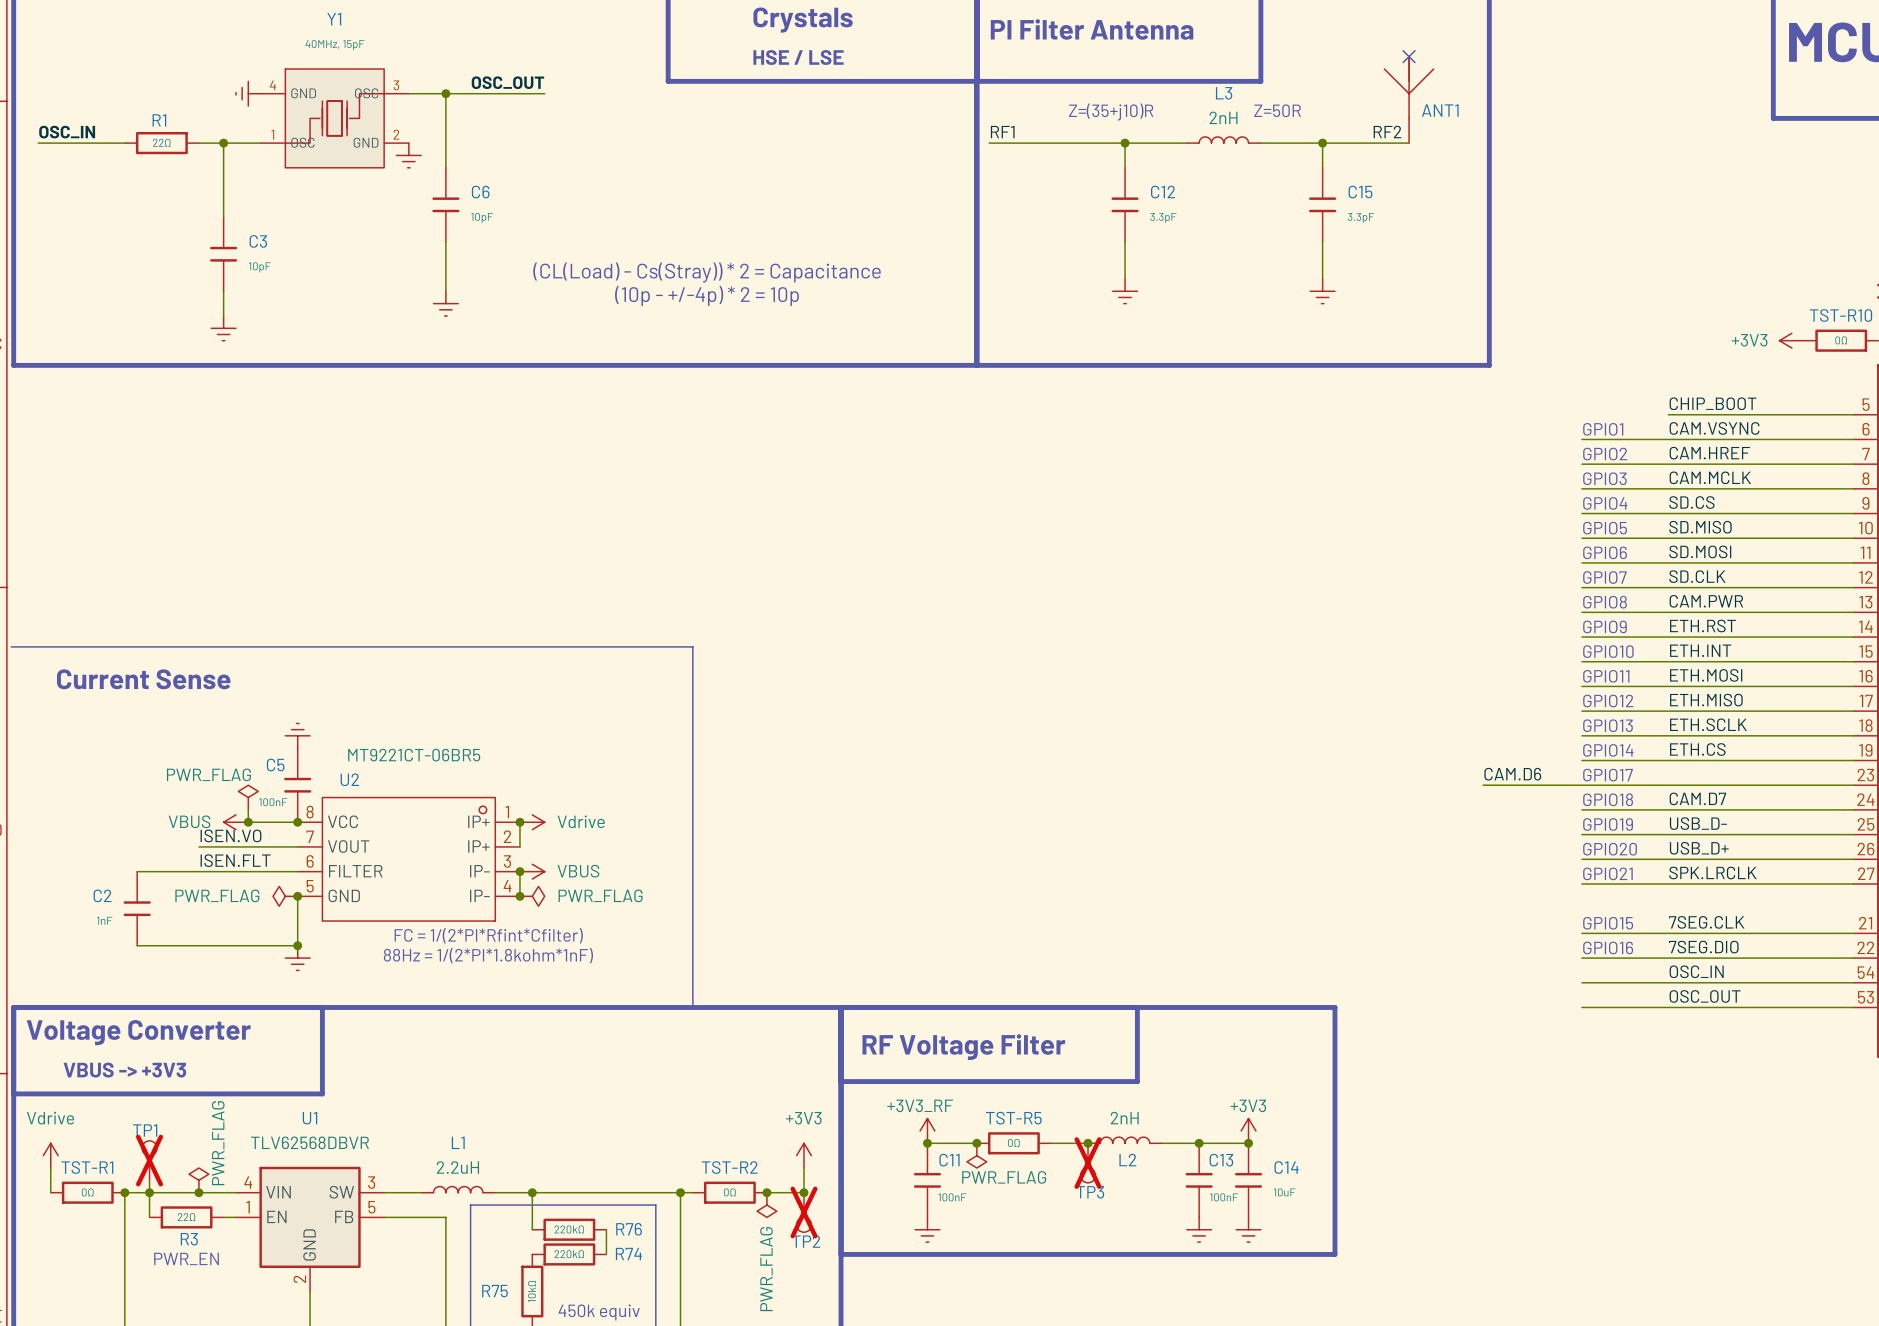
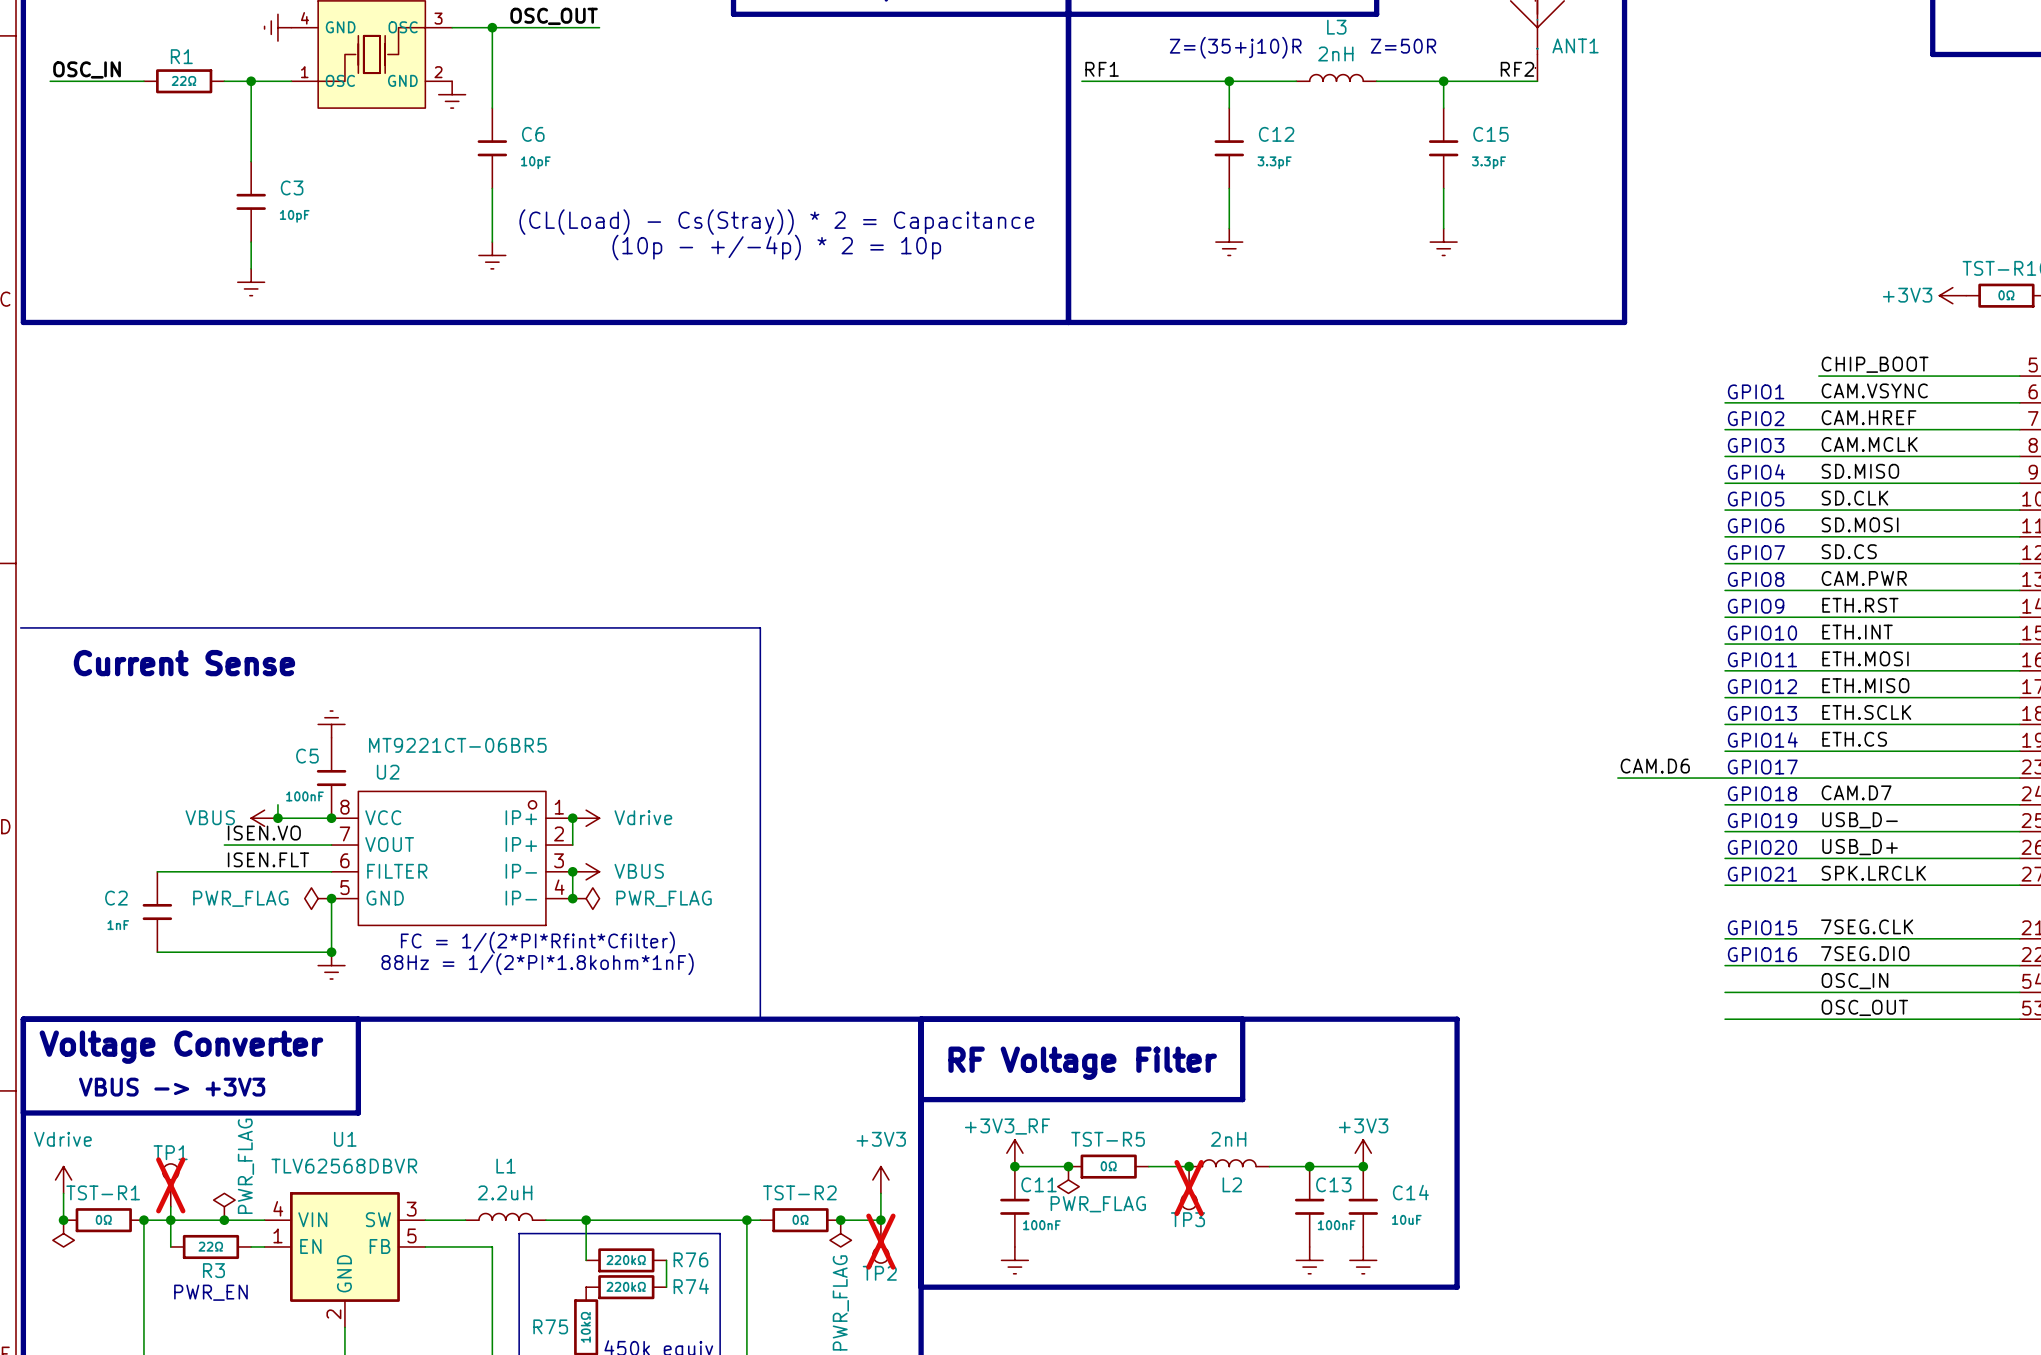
label: SD.CS (1691, 502) -> SD.MISO (1860, 471)
label: SD.MISO (1700, 527) -> SD.CLK (1854, 498)
label: SD.CLK (1697, 576) -> SD.CS (1849, 551)
power symbol: PWR_FLAG (248, 797) -> none
junction: none -> (63, 1220)
power symbol: none -> (63, 1233)

